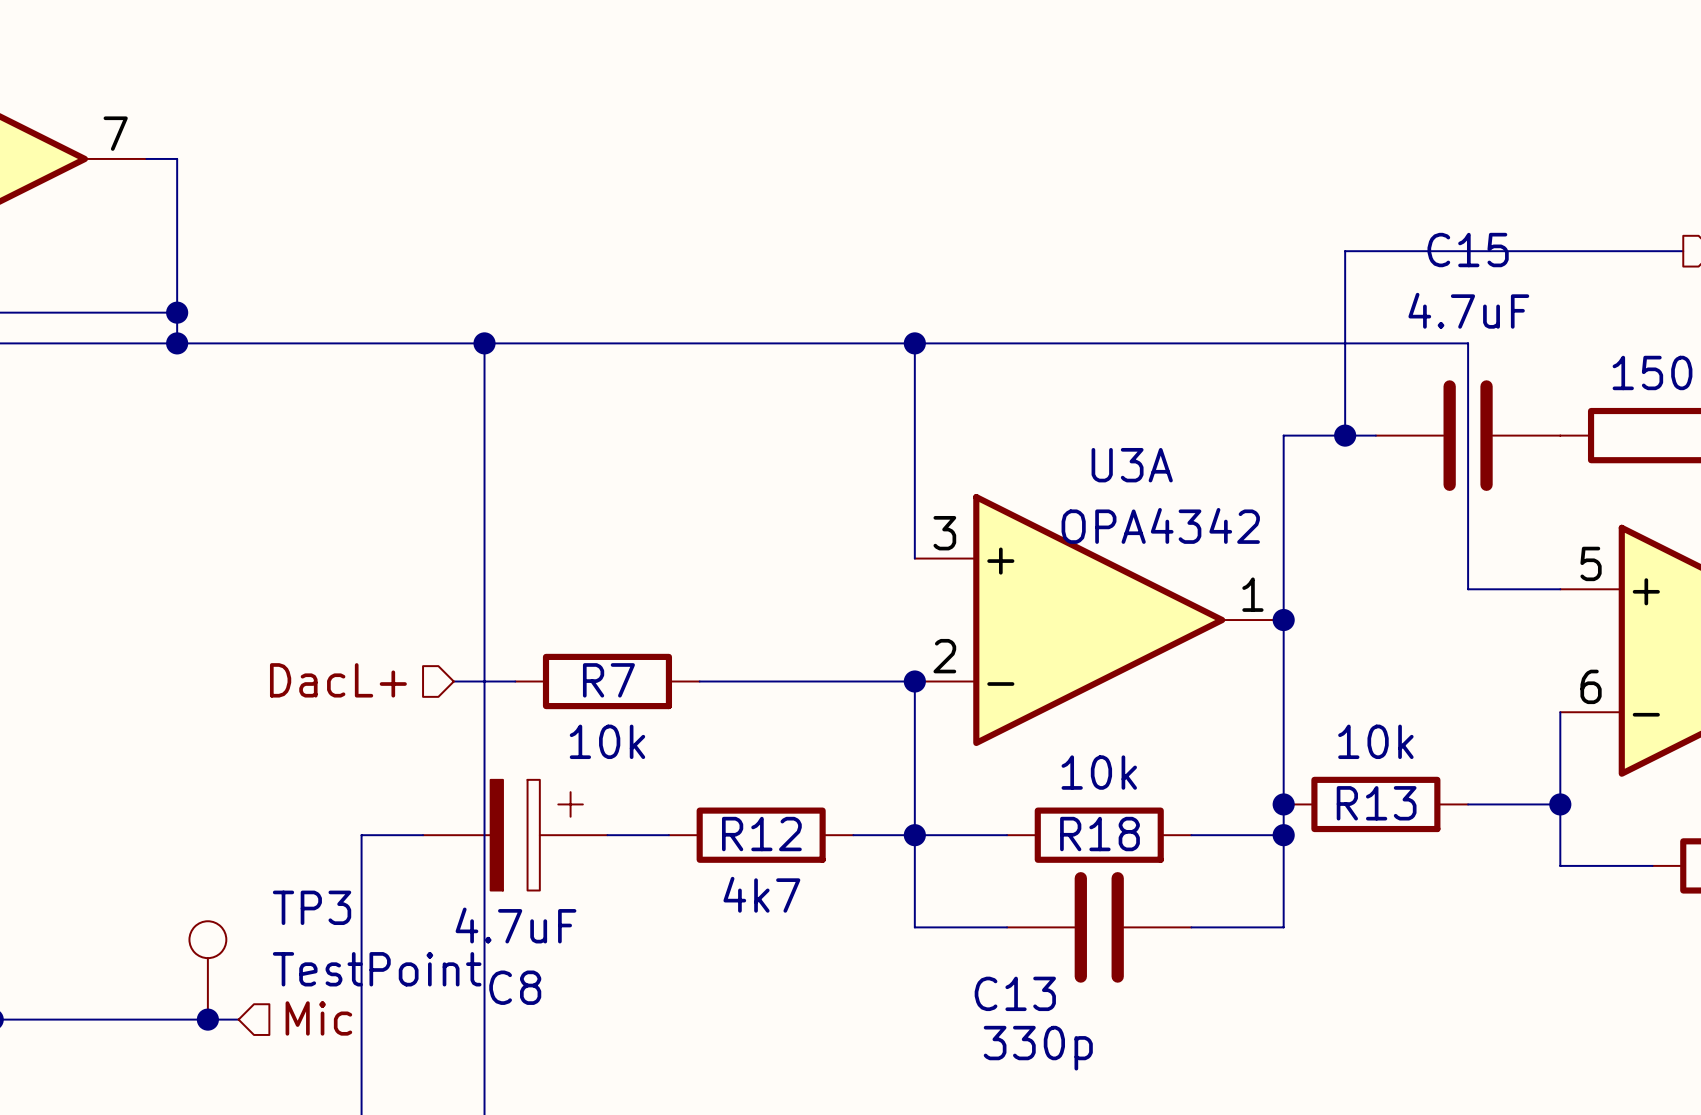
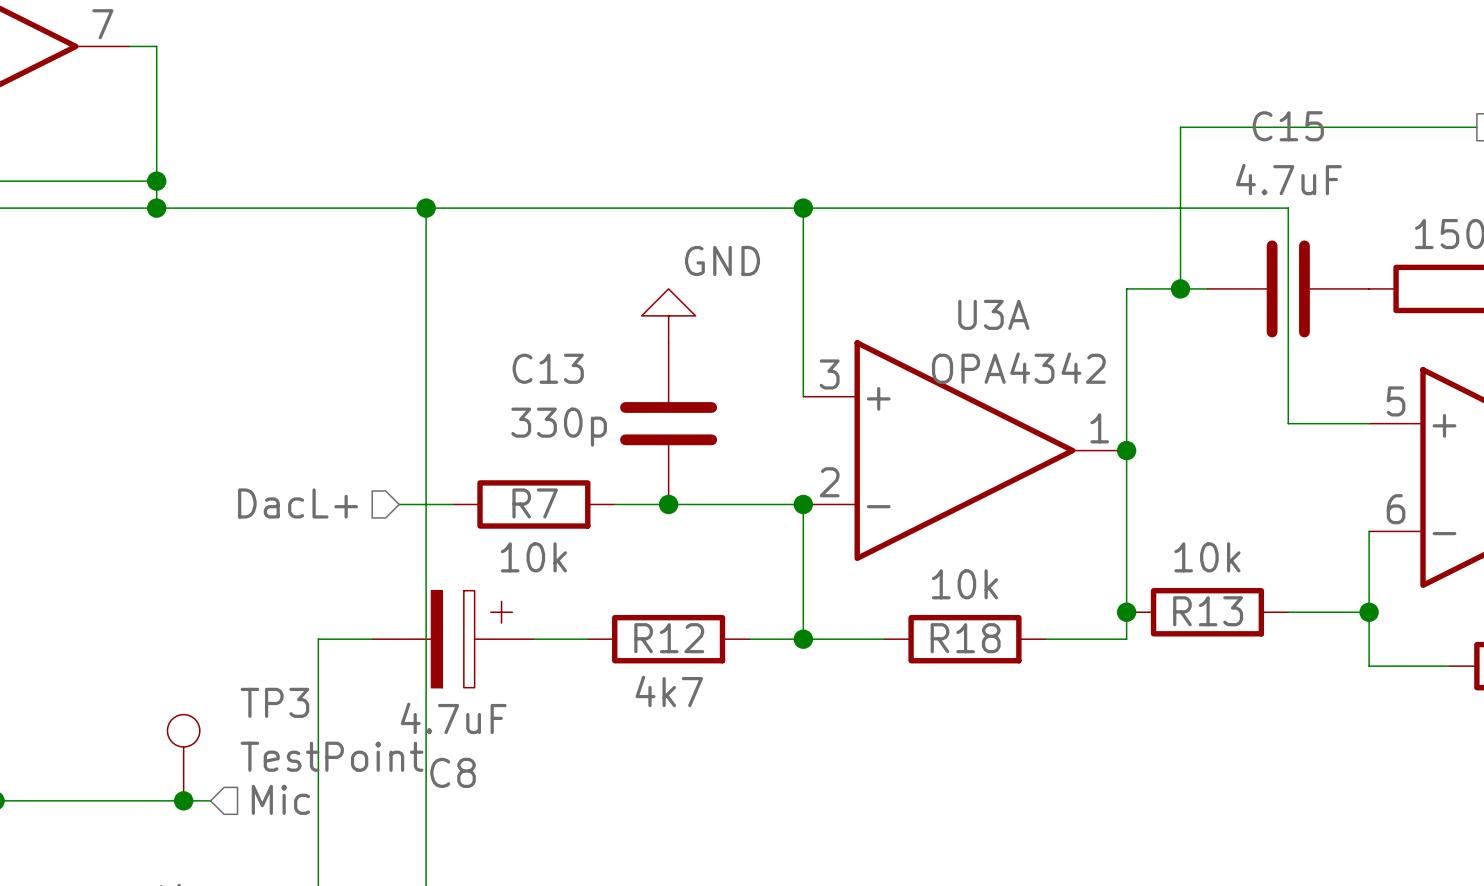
power symbol: none -> GND (668, 315)
junction: none -> (668, 504)
wire: (914, 835) (914, 927) (1007, 927) -> none
wire: (1283, 835) (1283, 927) (1191, 927) -> none
junction: (1283, 835) -> none
C13 rotation: 0° (1099, 927) -> 90° clockwise (668, 423)
C13 position: (1099, 927) -> (668, 423)
C13 name position: C13 (1015, 993) -> C13 (548, 368)
C13 value position: 330p (1038, 1048) -> 330p (559, 427)

